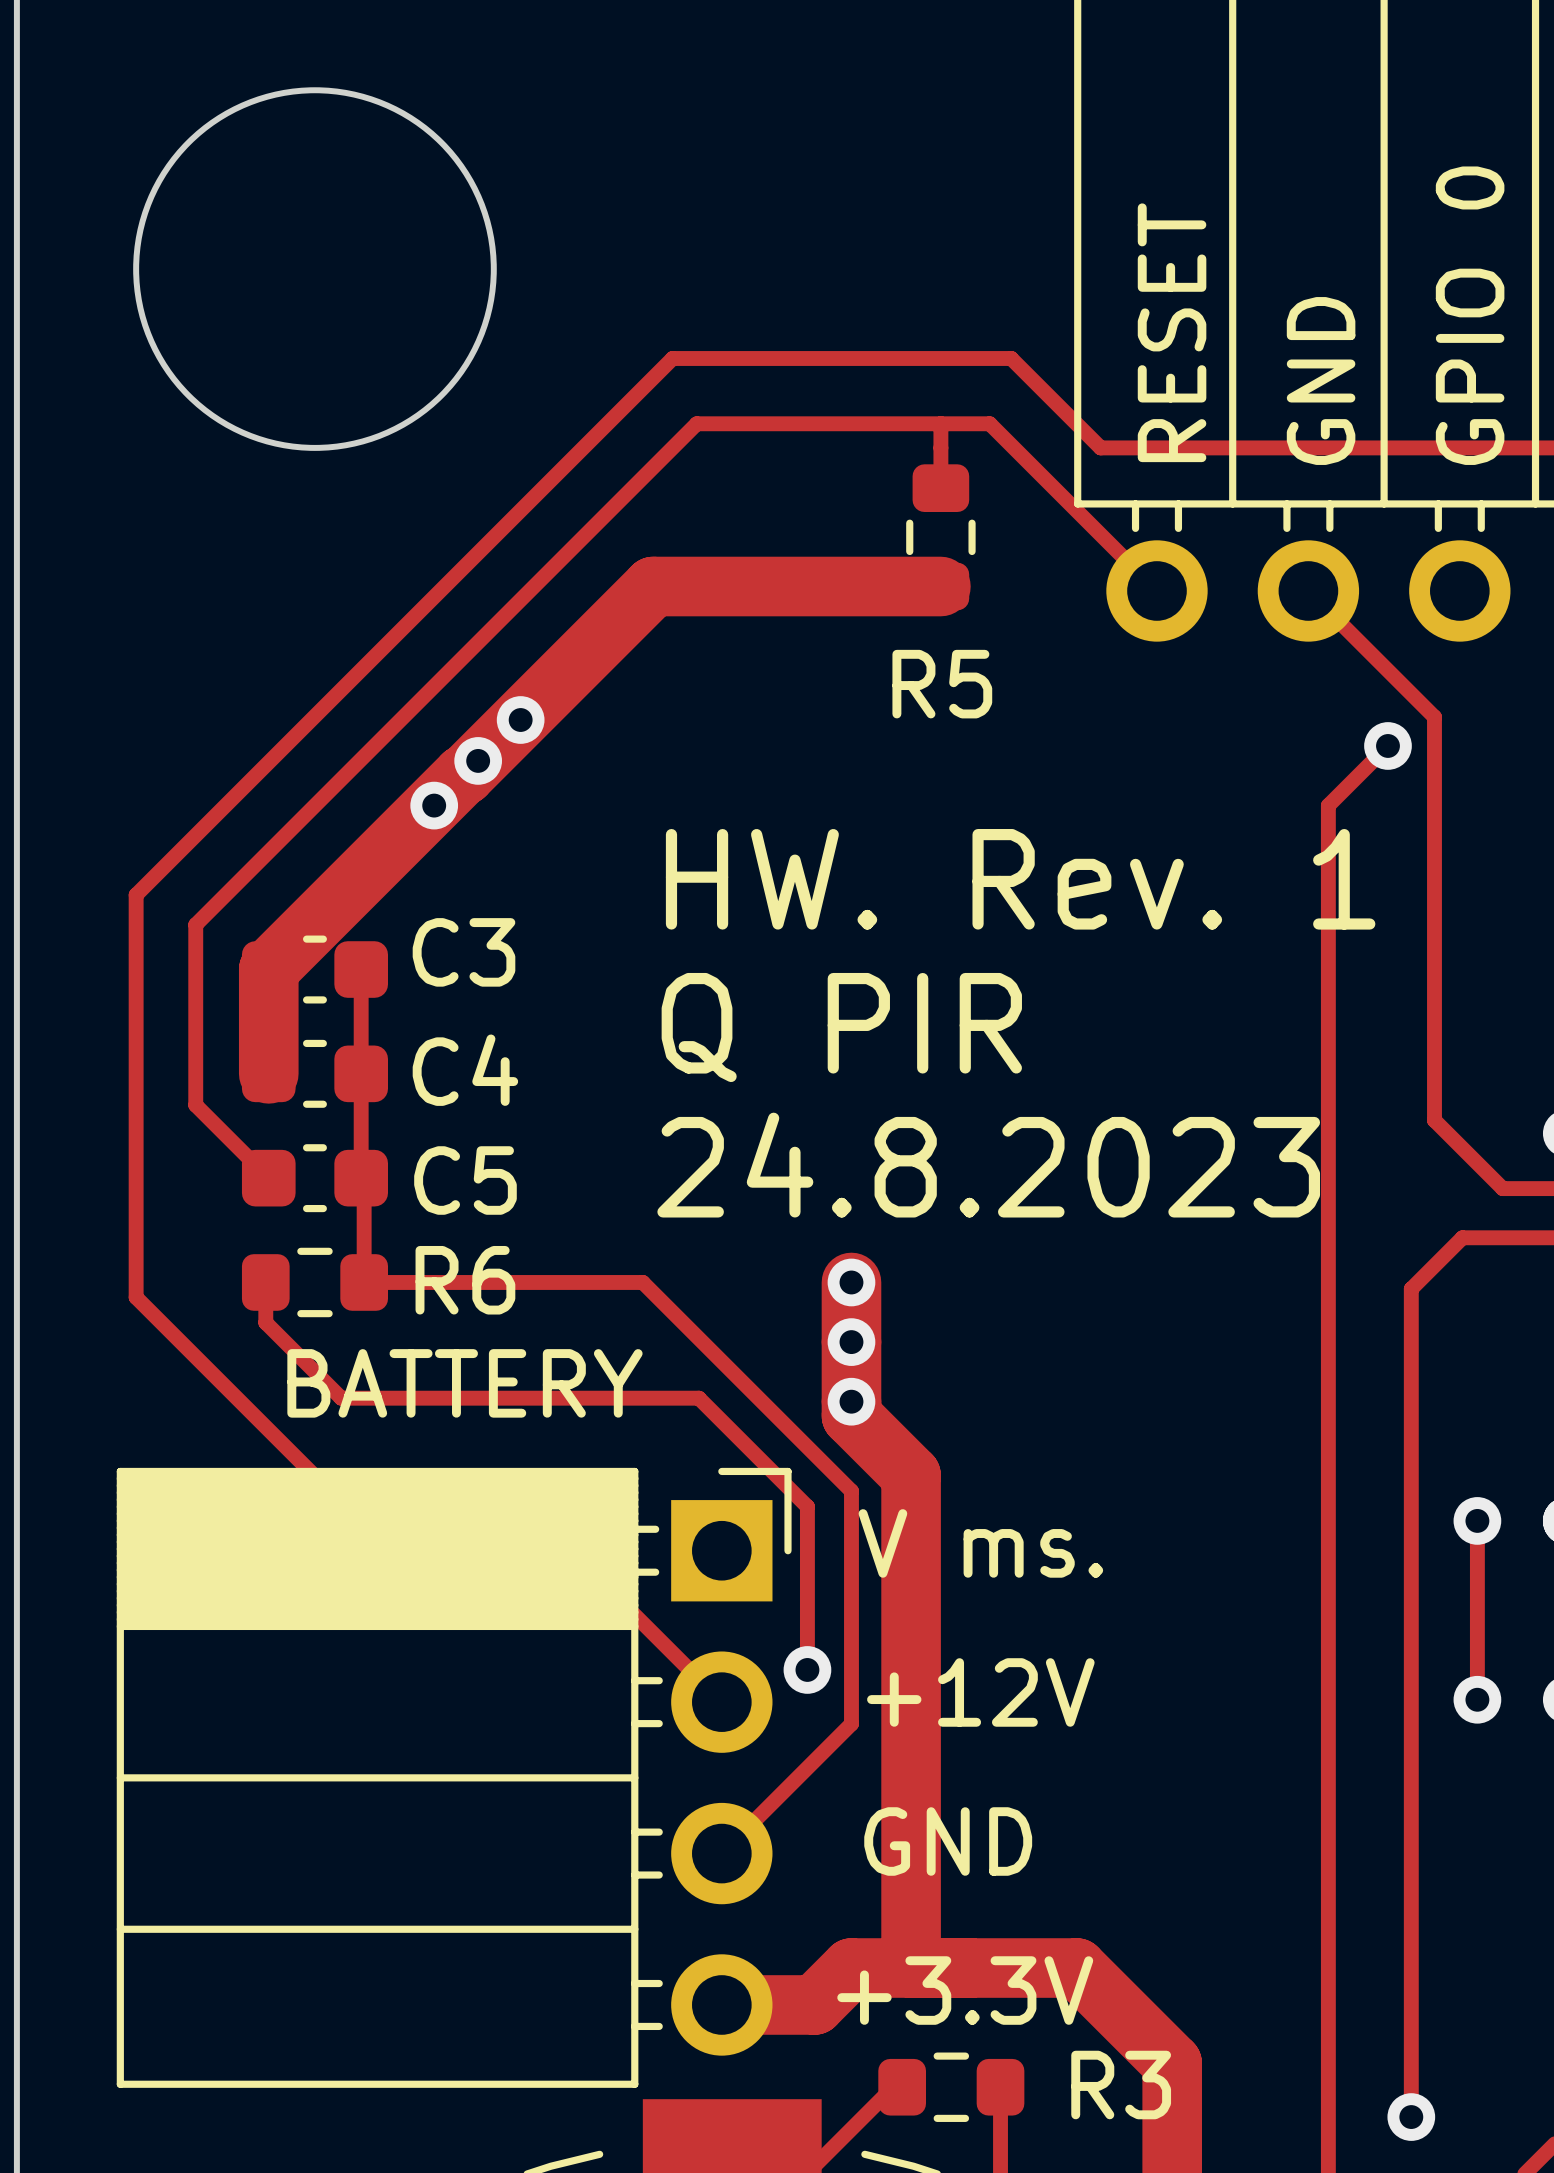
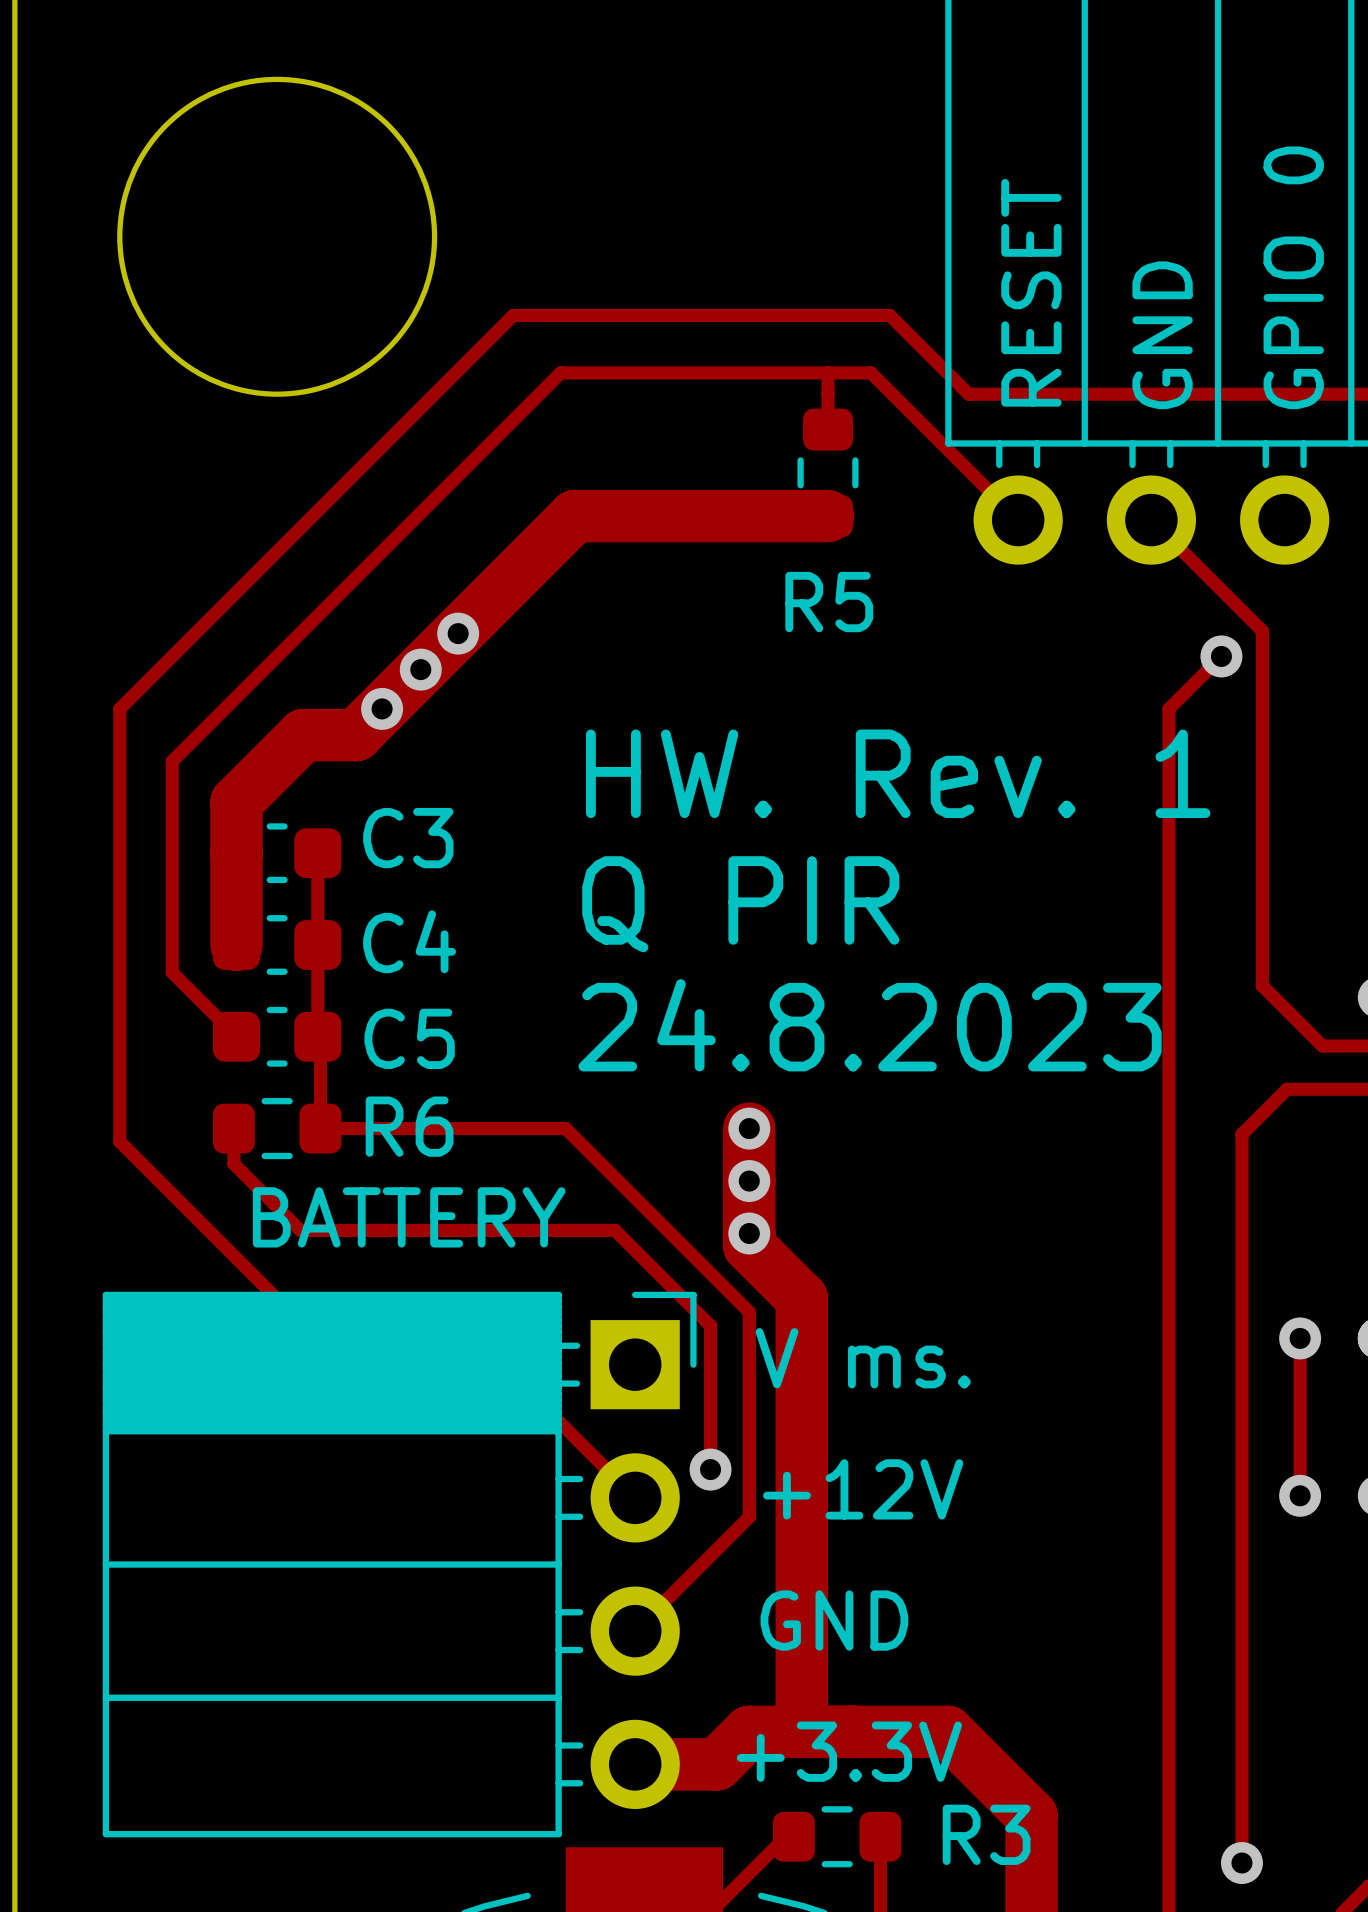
track: (672, 358) (136, 895) -> (591, 315) (513, 315) (119, 708) (119, 787)
track: (696, 423) (195, 924) -> (613, 372) (560, 372) (172, 761) (172, 813)
track: (464, 775) (268, 969) -> (408, 682) (355, 735) (303, 735) (236, 802) (236, 853)

